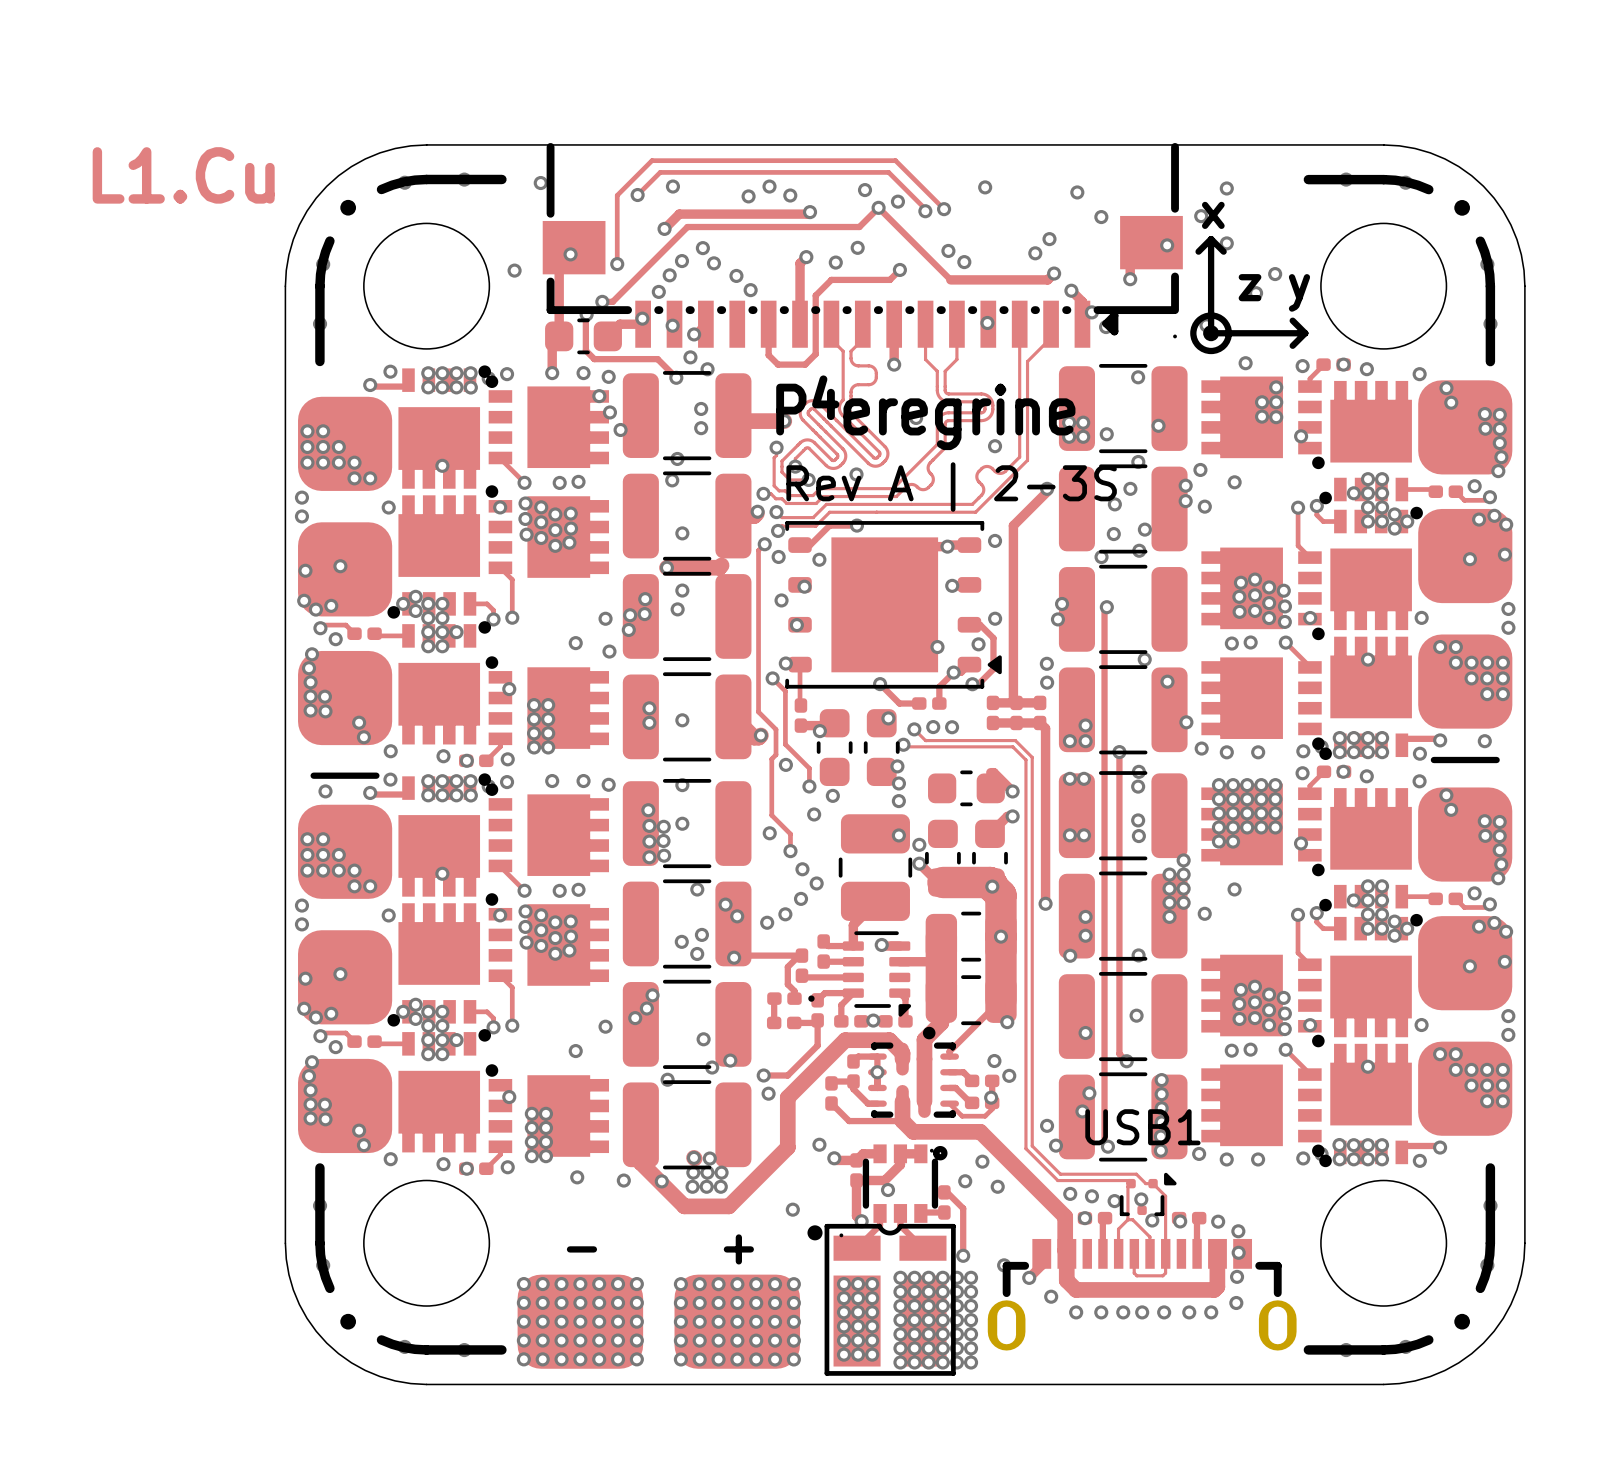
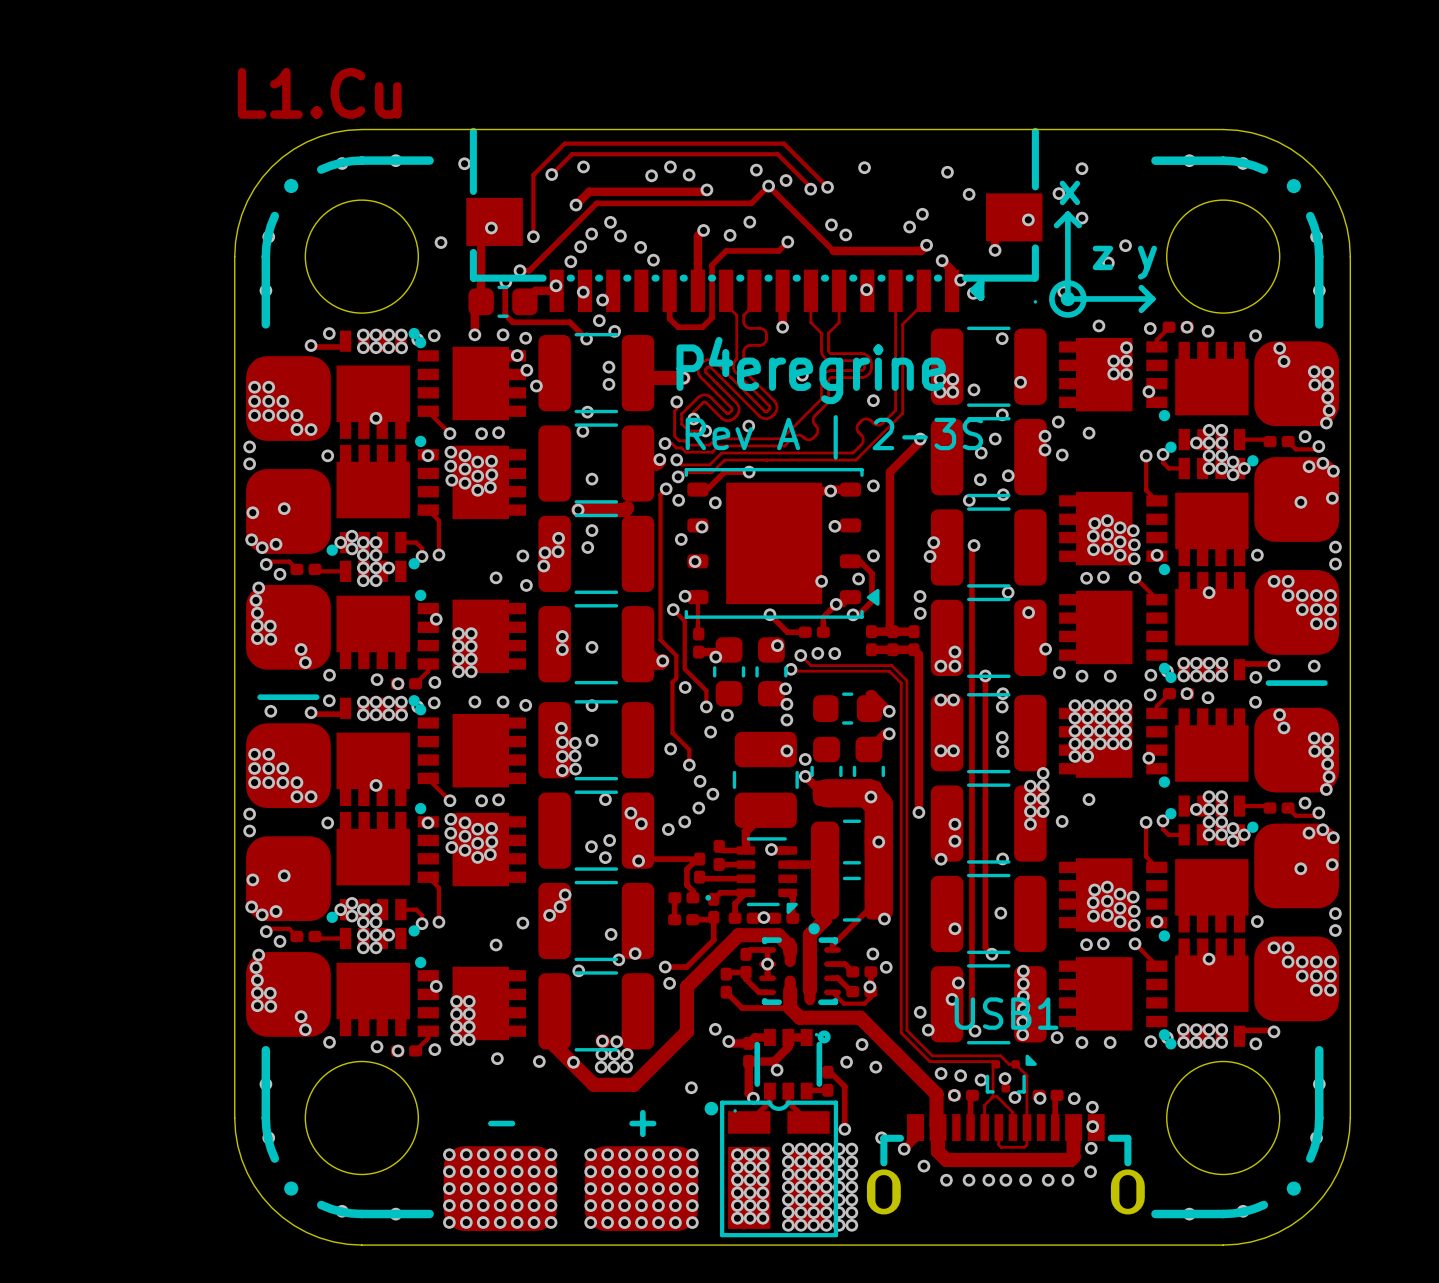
text position: L1.Cu (183, 175) -> L1.Cu (319, 93)

